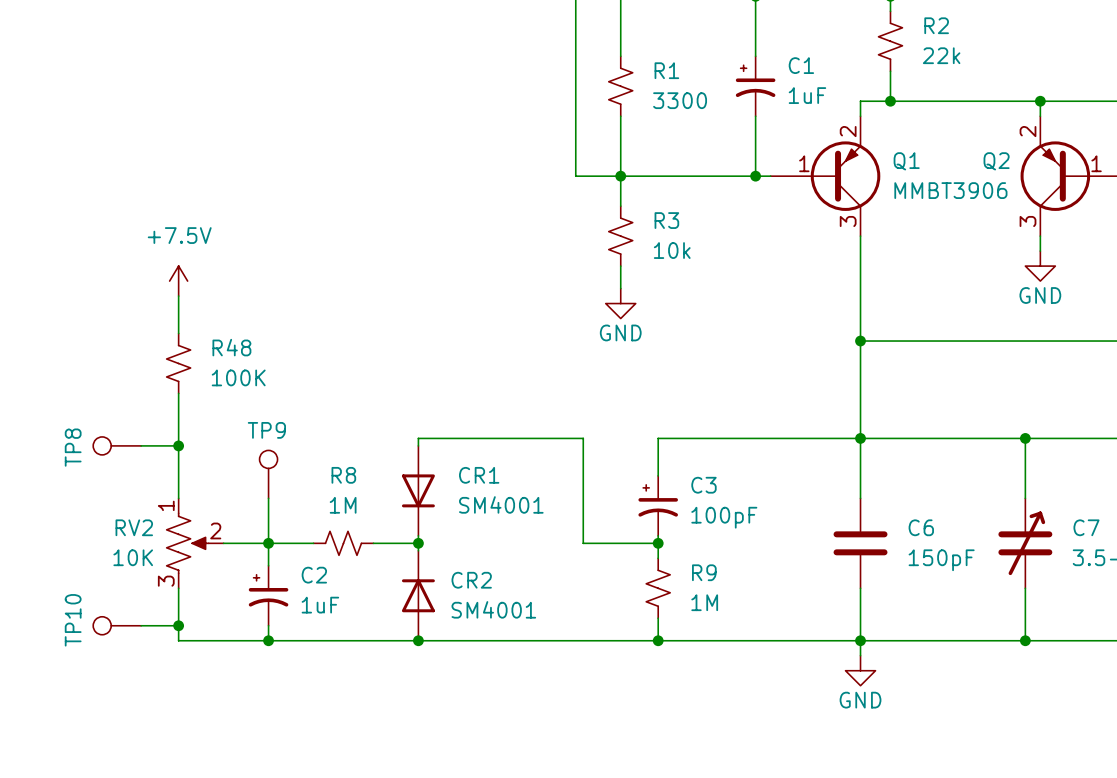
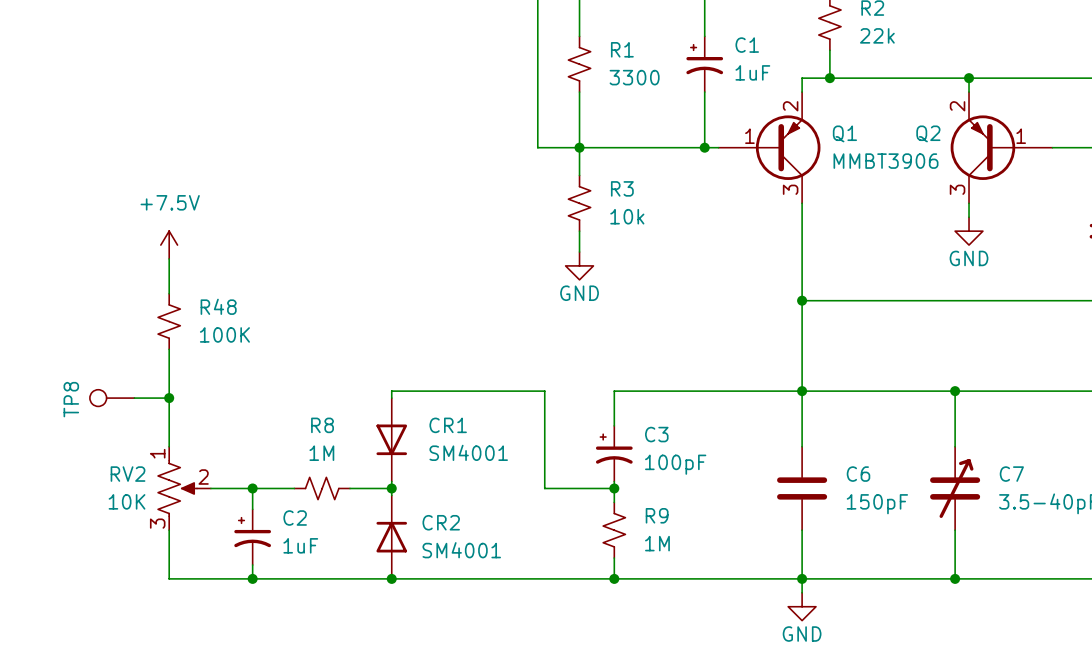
TP9: (268, 474) -> none
wire: (268, 498) (268, 543) -> none
TP10: (117, 625) -> none
wire: (141, 625) (178, 625) -> none
junction: (178, 625) -> none

